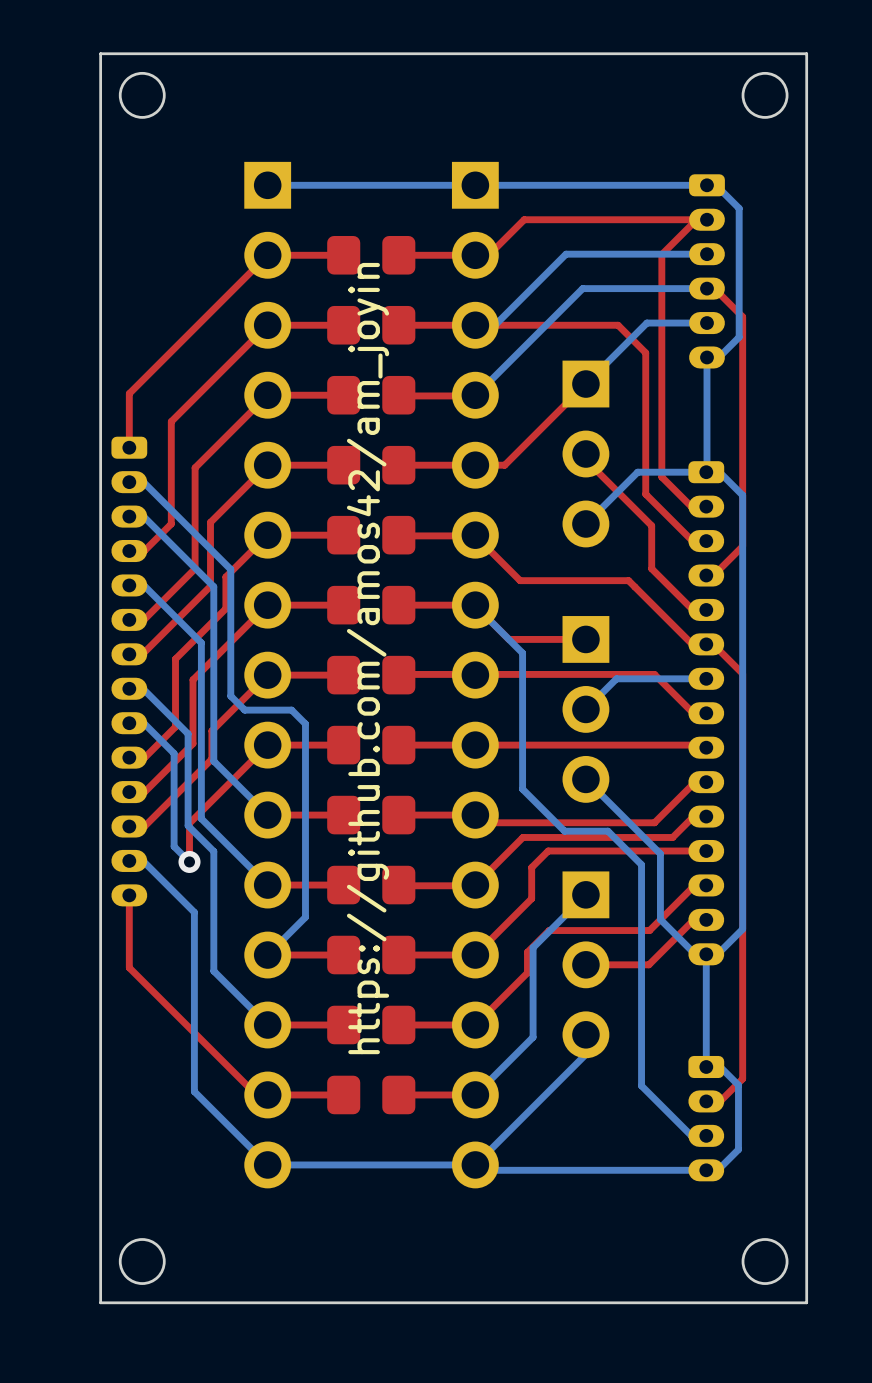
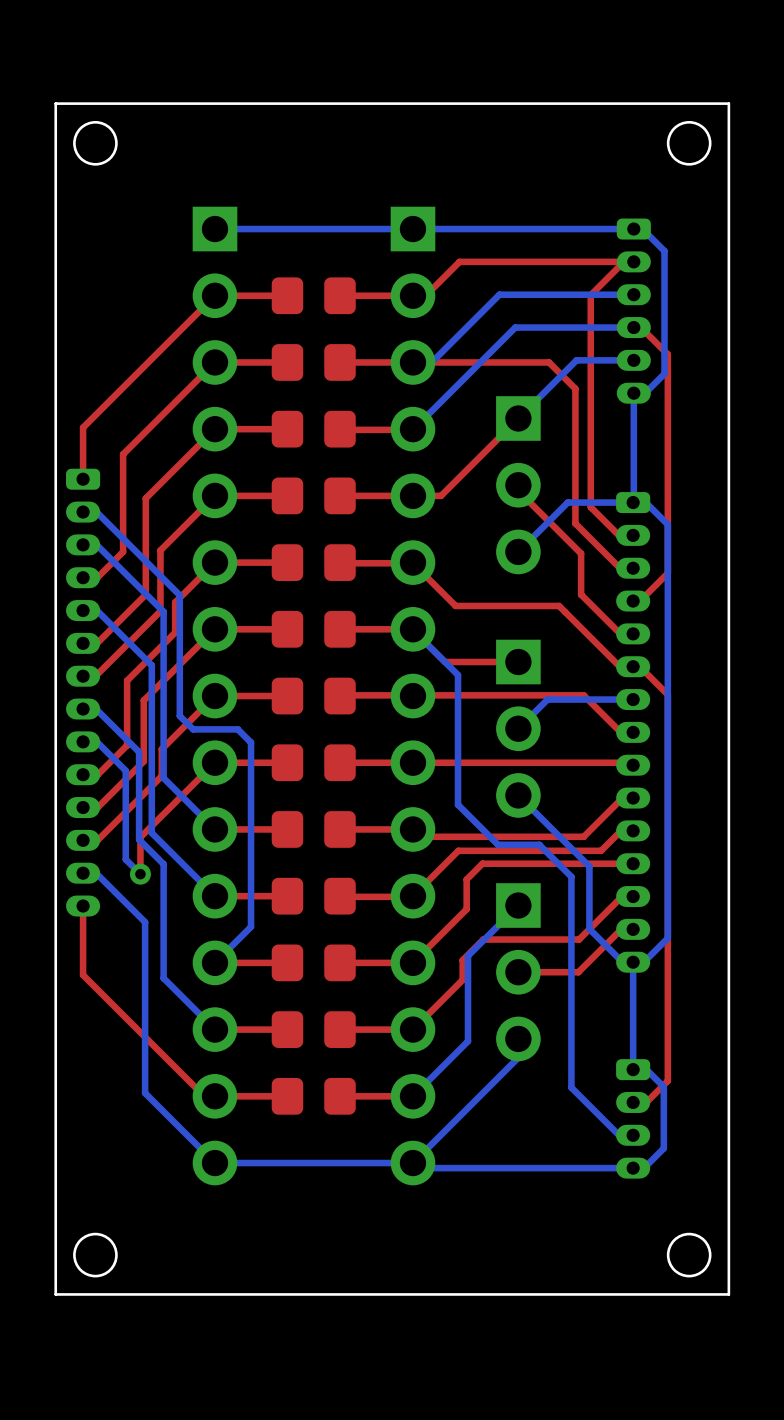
text: https://github.com/amos42/am_joyin (368, 658) -> none

